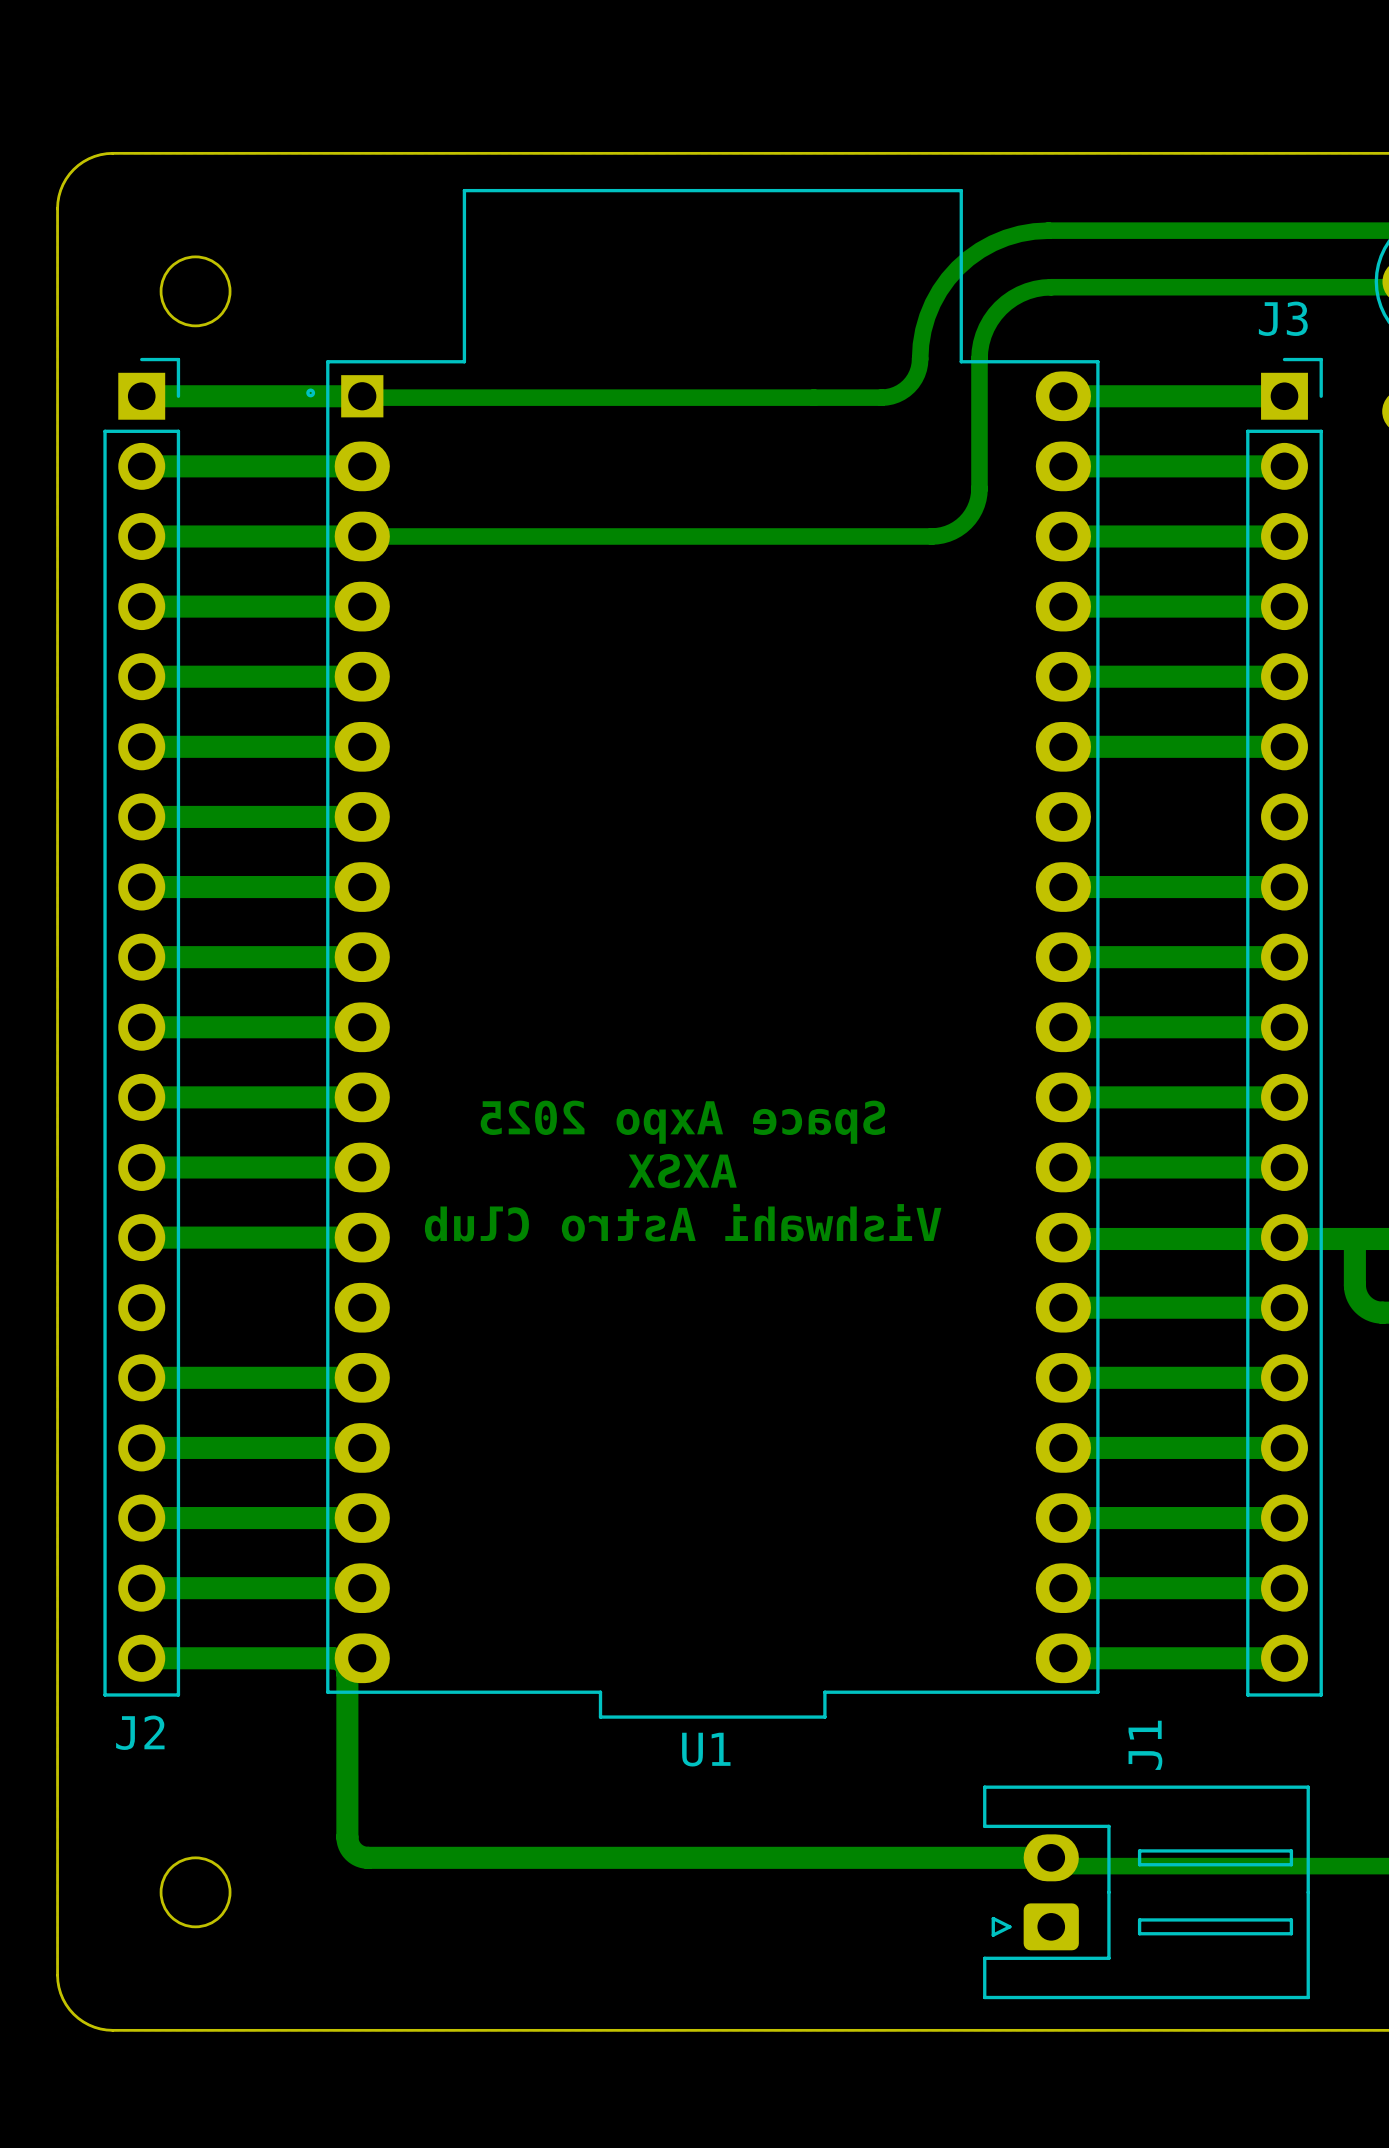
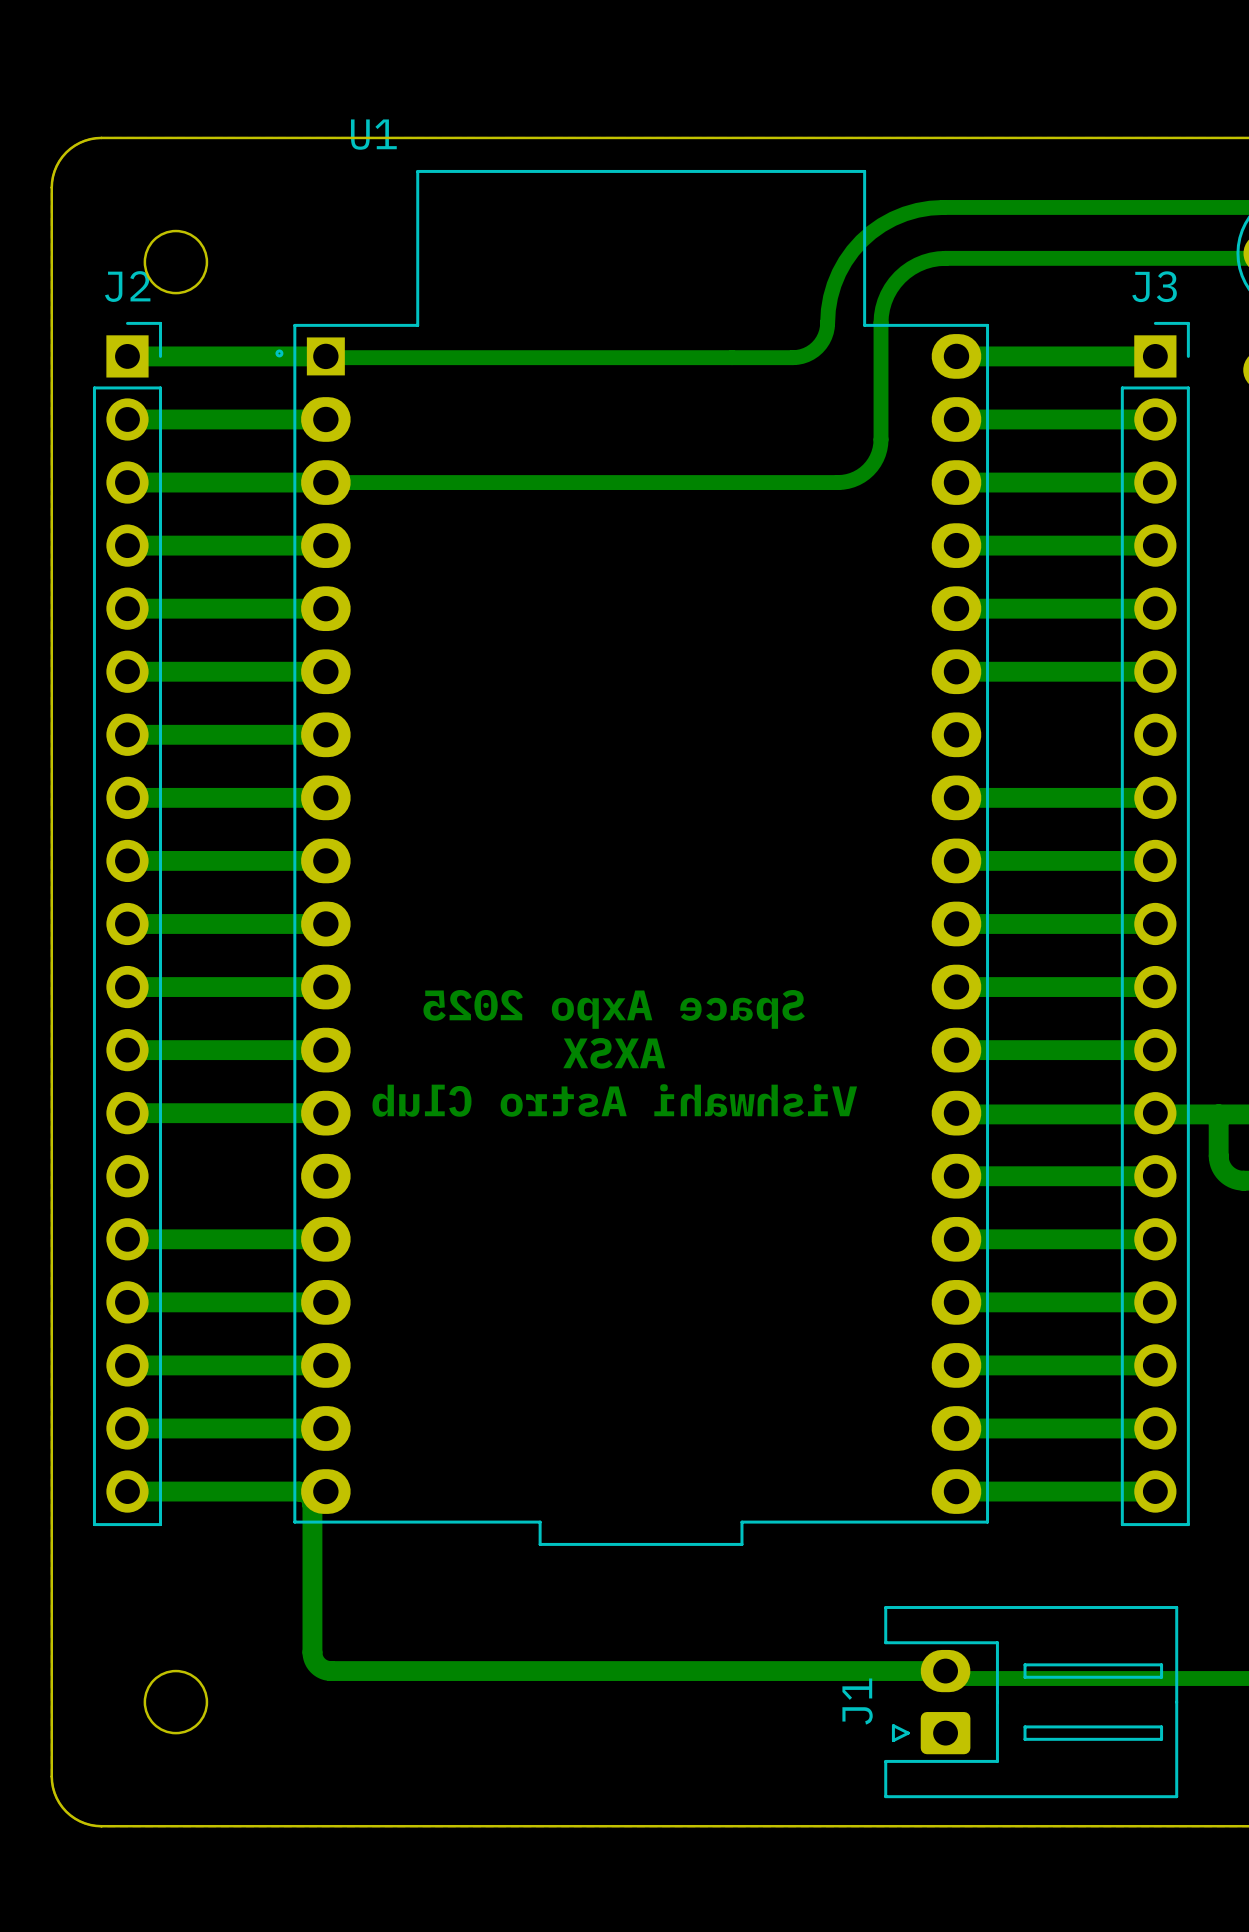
J2 name position: J2 (140, 1732) -> J2 (127, 286)
J1 name position: J1 (1145, 1745) -> J1 (857, 1701)
U1 name position: U1 (706, 1749) -> U1 (373, 134)

